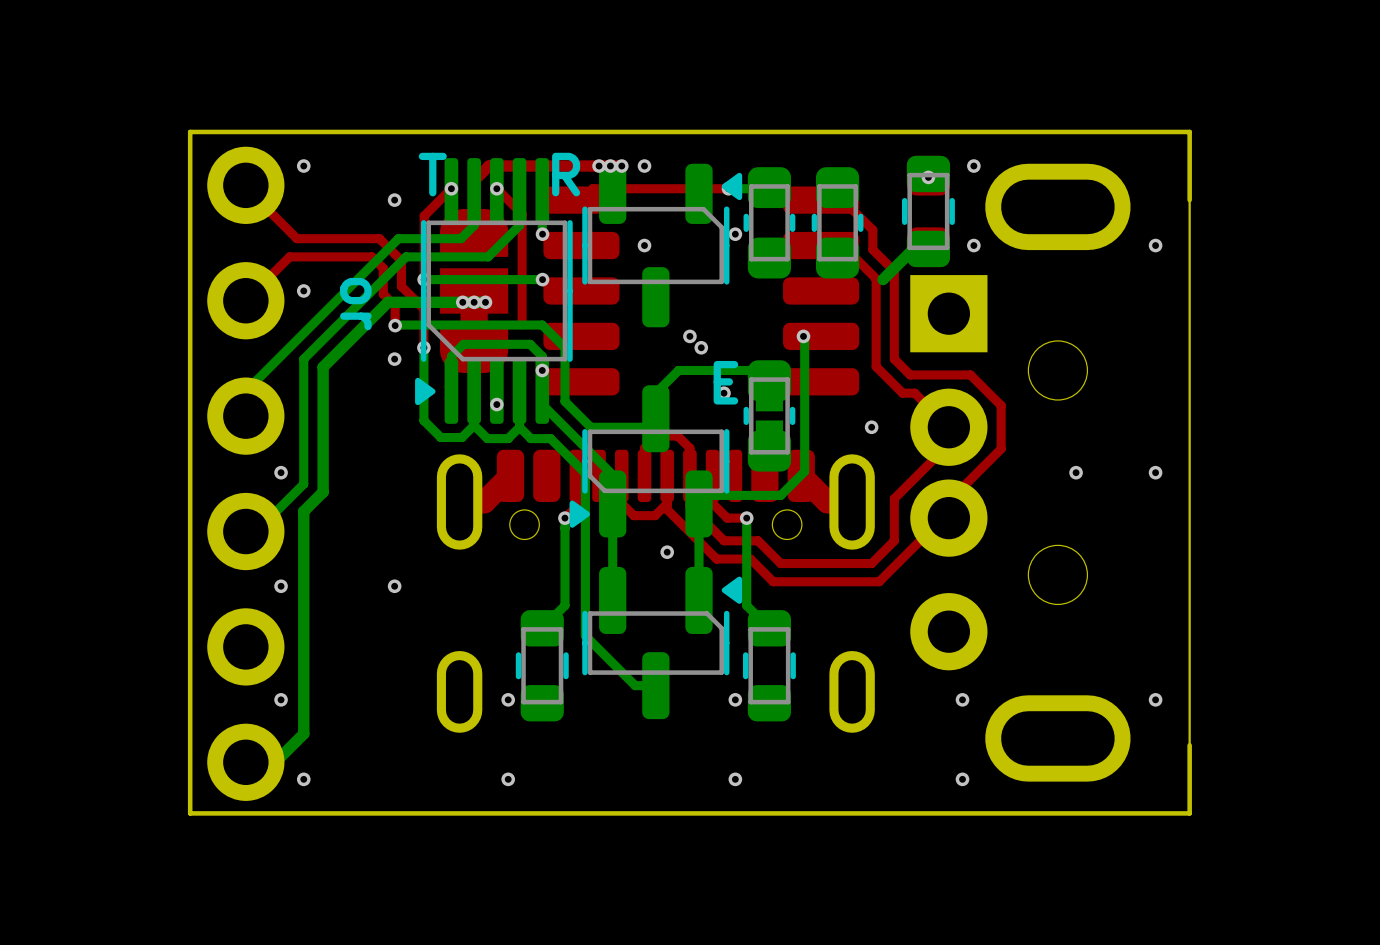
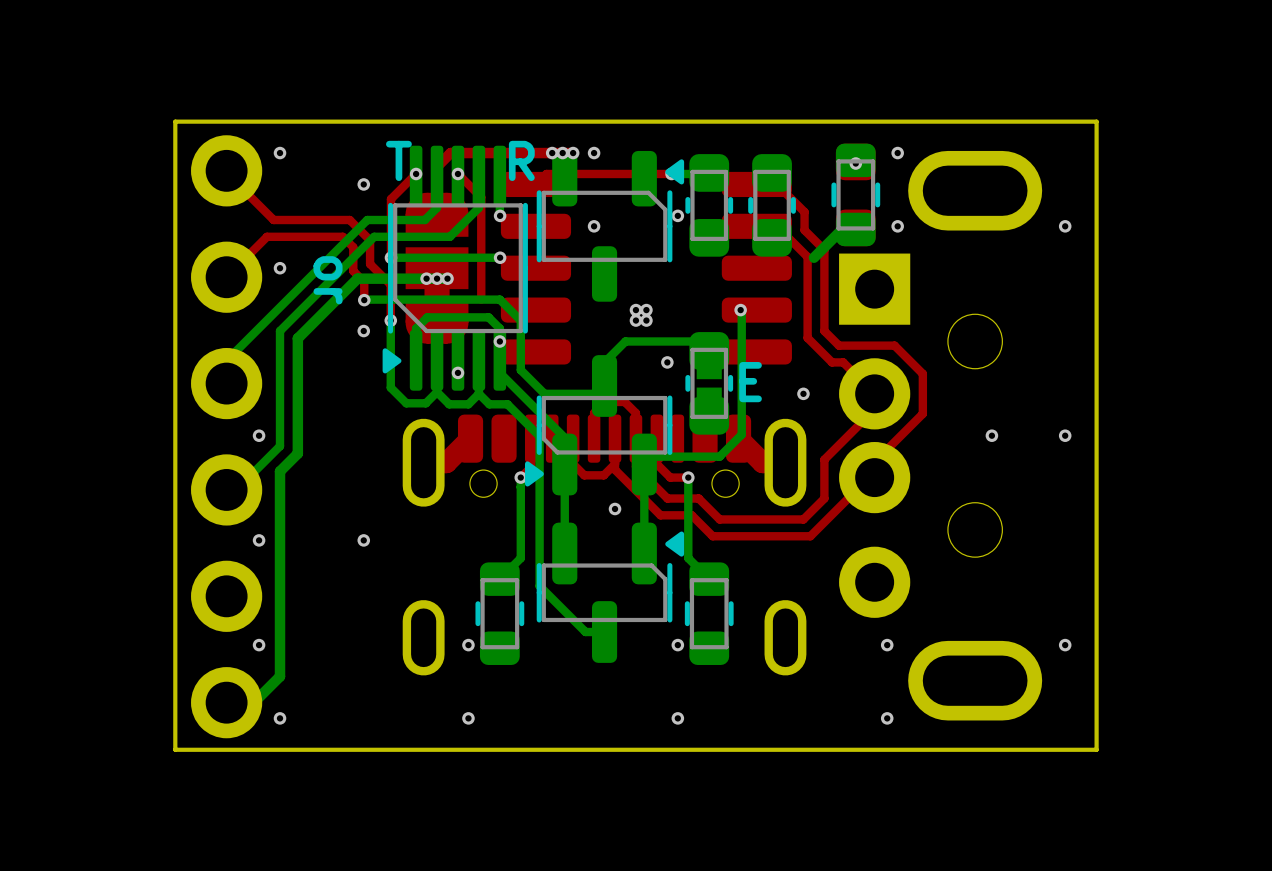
board edge: none -> (1096, 184) (1096, 686)
via: none -> (646, 310)
via: none -> (635, 320)
part text position: E (725, 382) -> E (750, 382)

